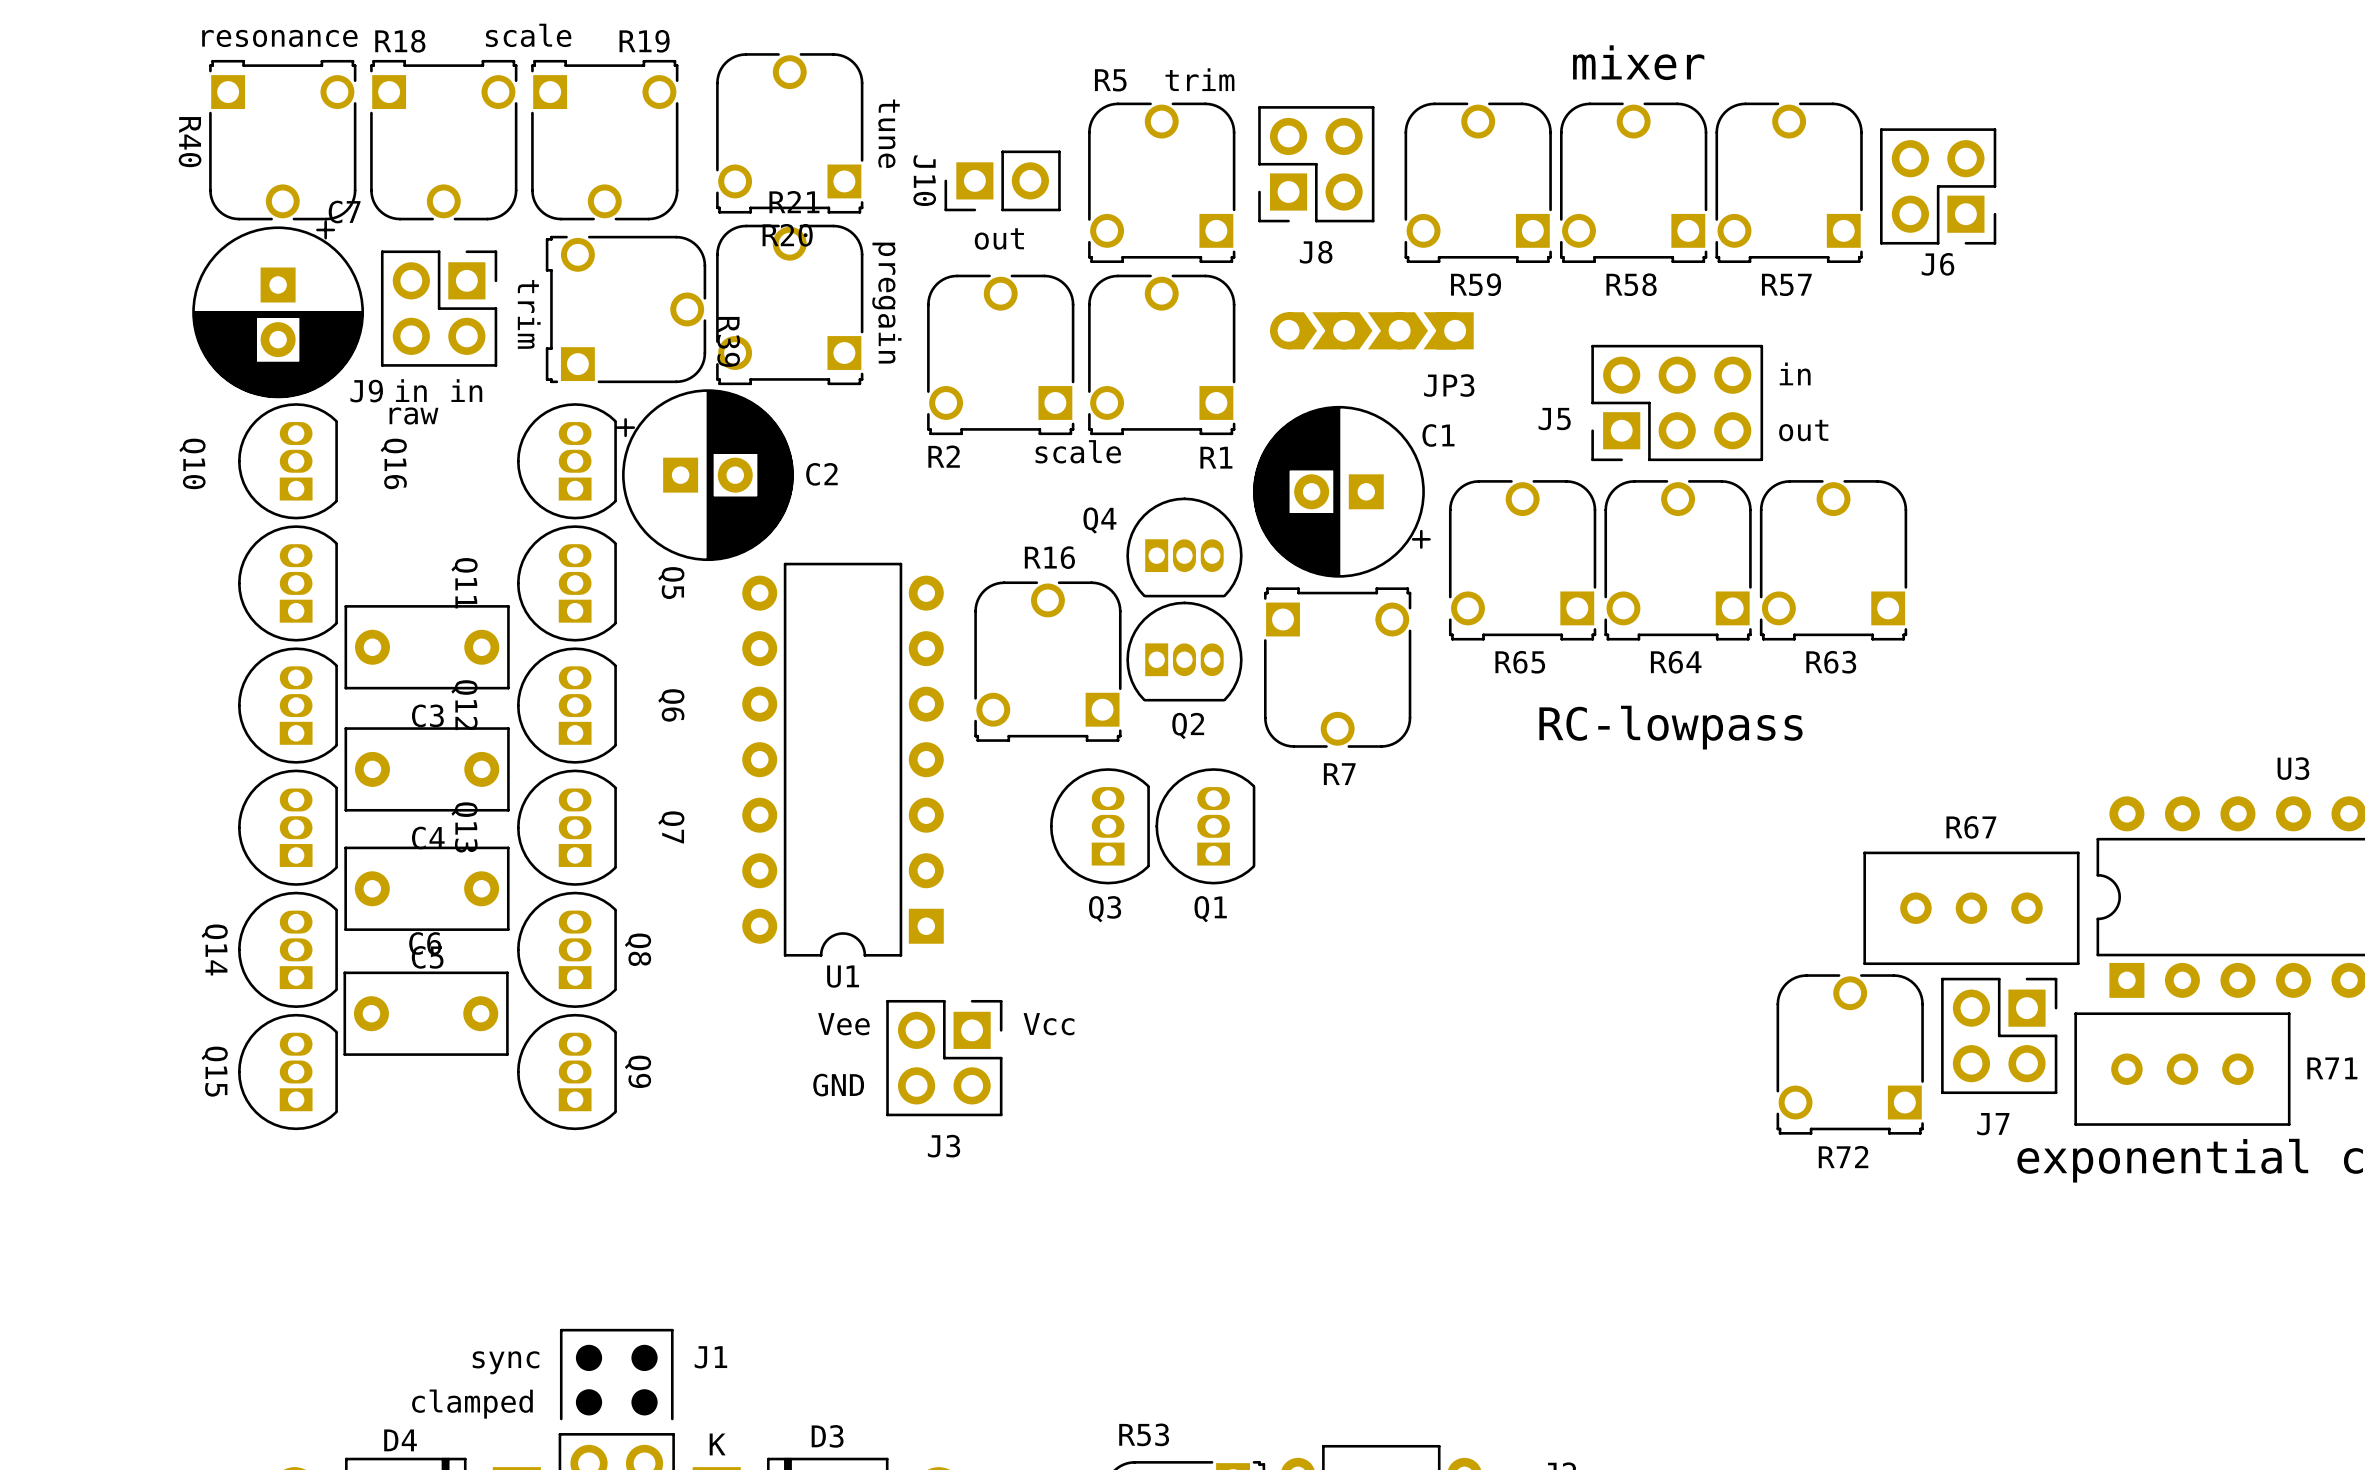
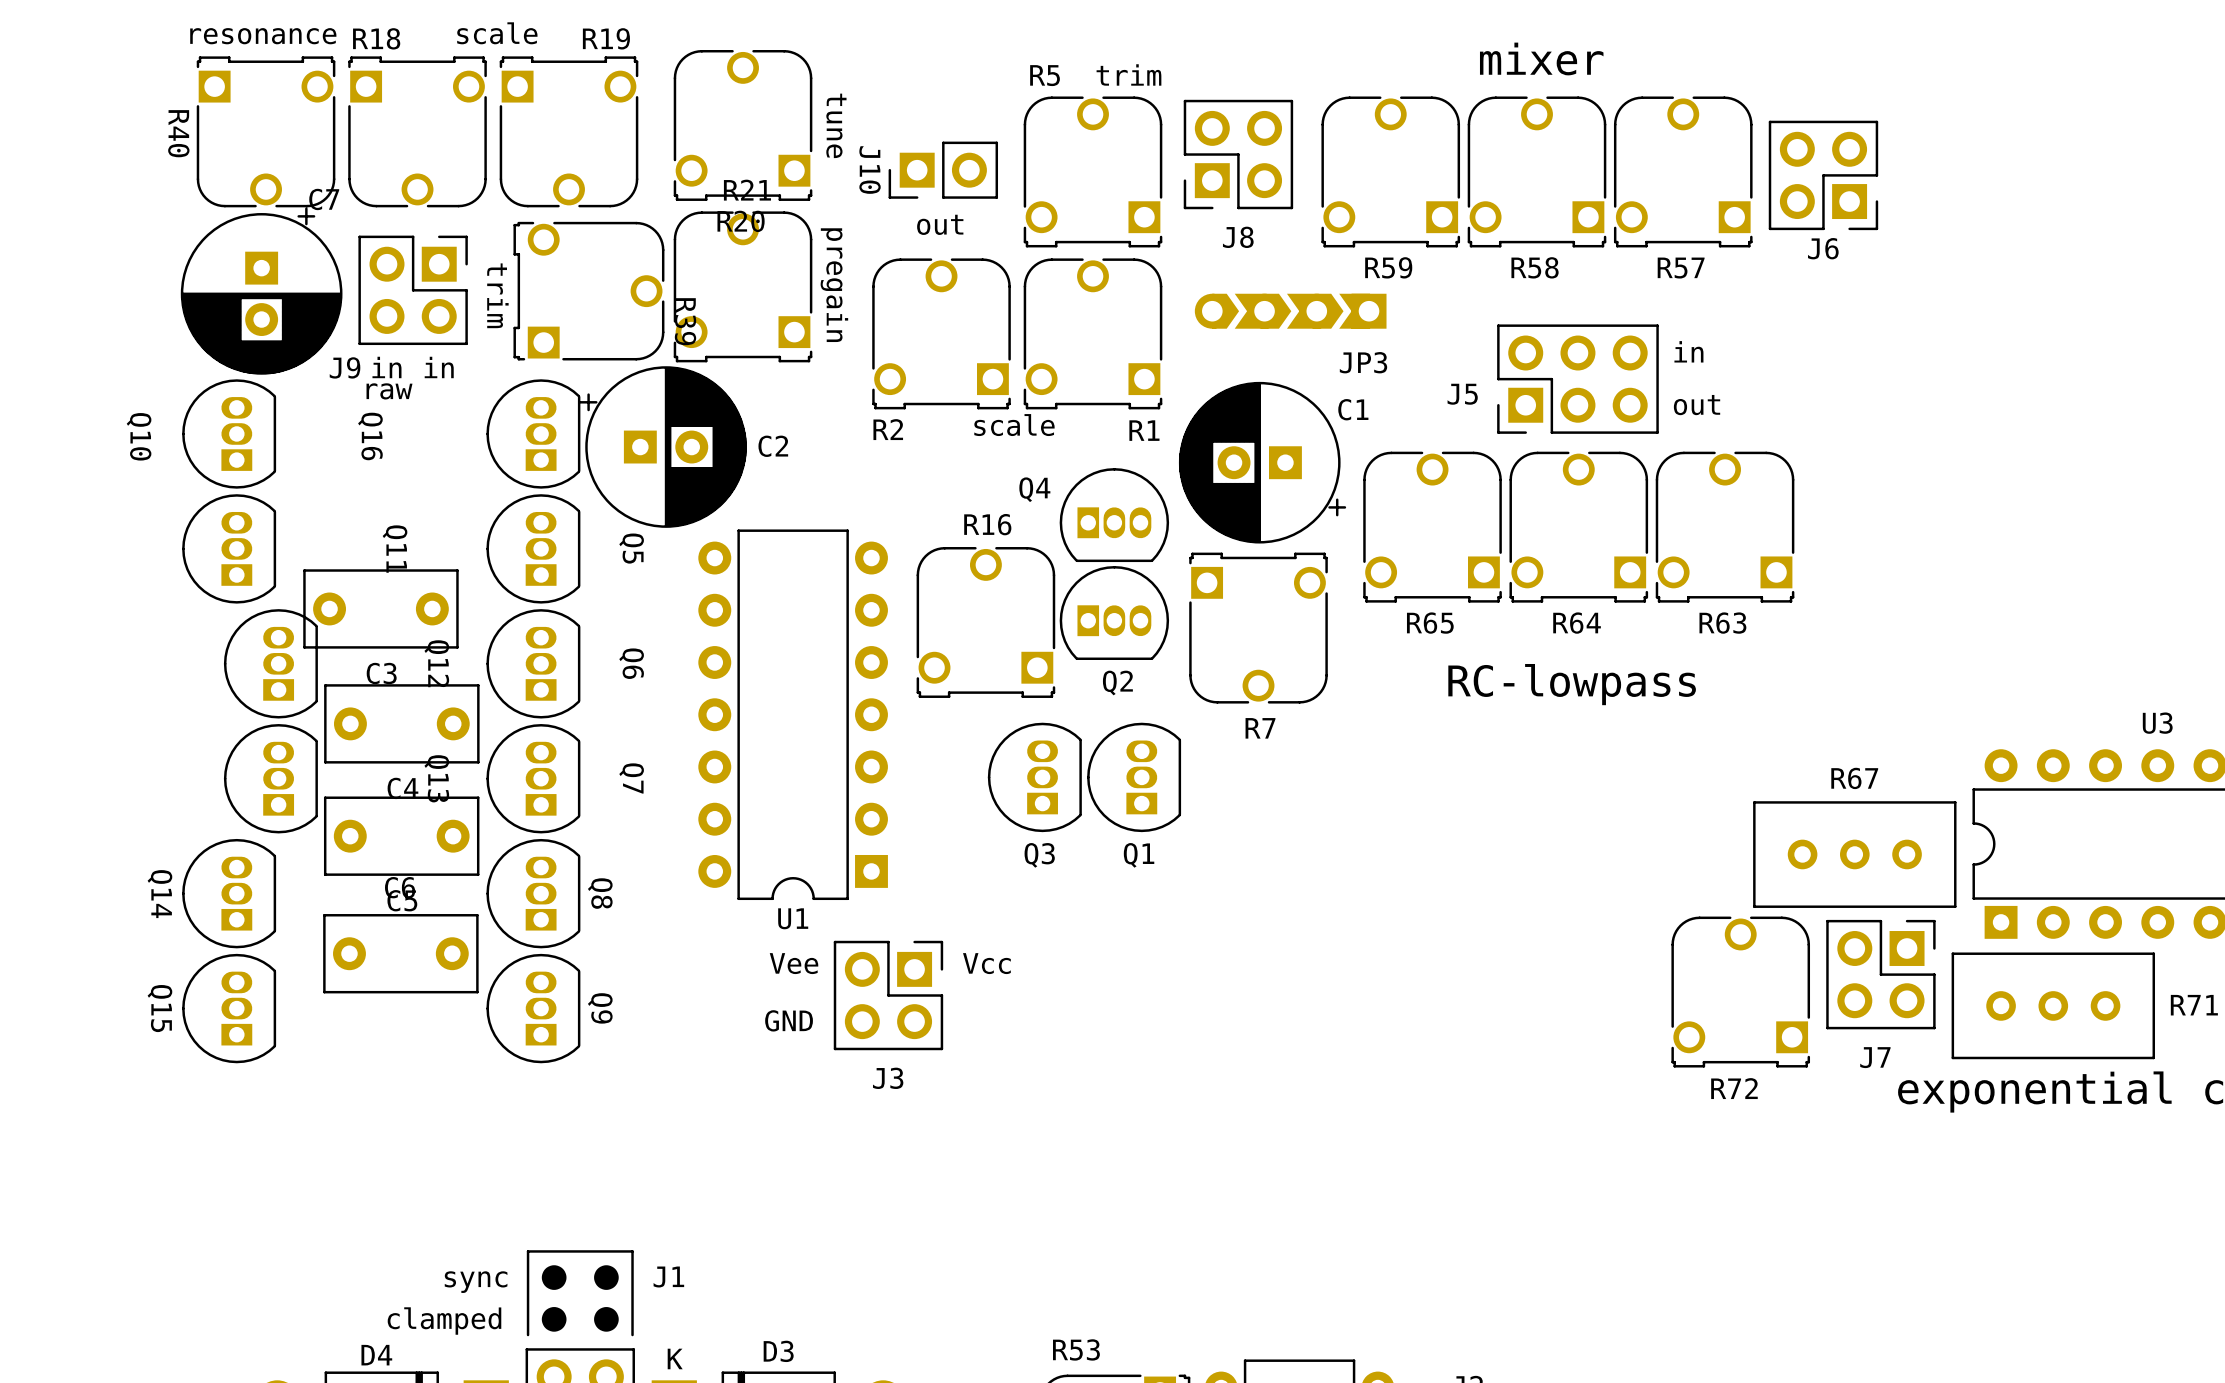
Q10 position: (287, 461) -> (229, 433)
Q11 position: (287, 583) -> (229, 548)
C3 position: (427, 647) -> (380, 608)
Q14 position: (287, 949) -> (229, 893)
Q15 position: (287, 1071) -> (229, 1008)

